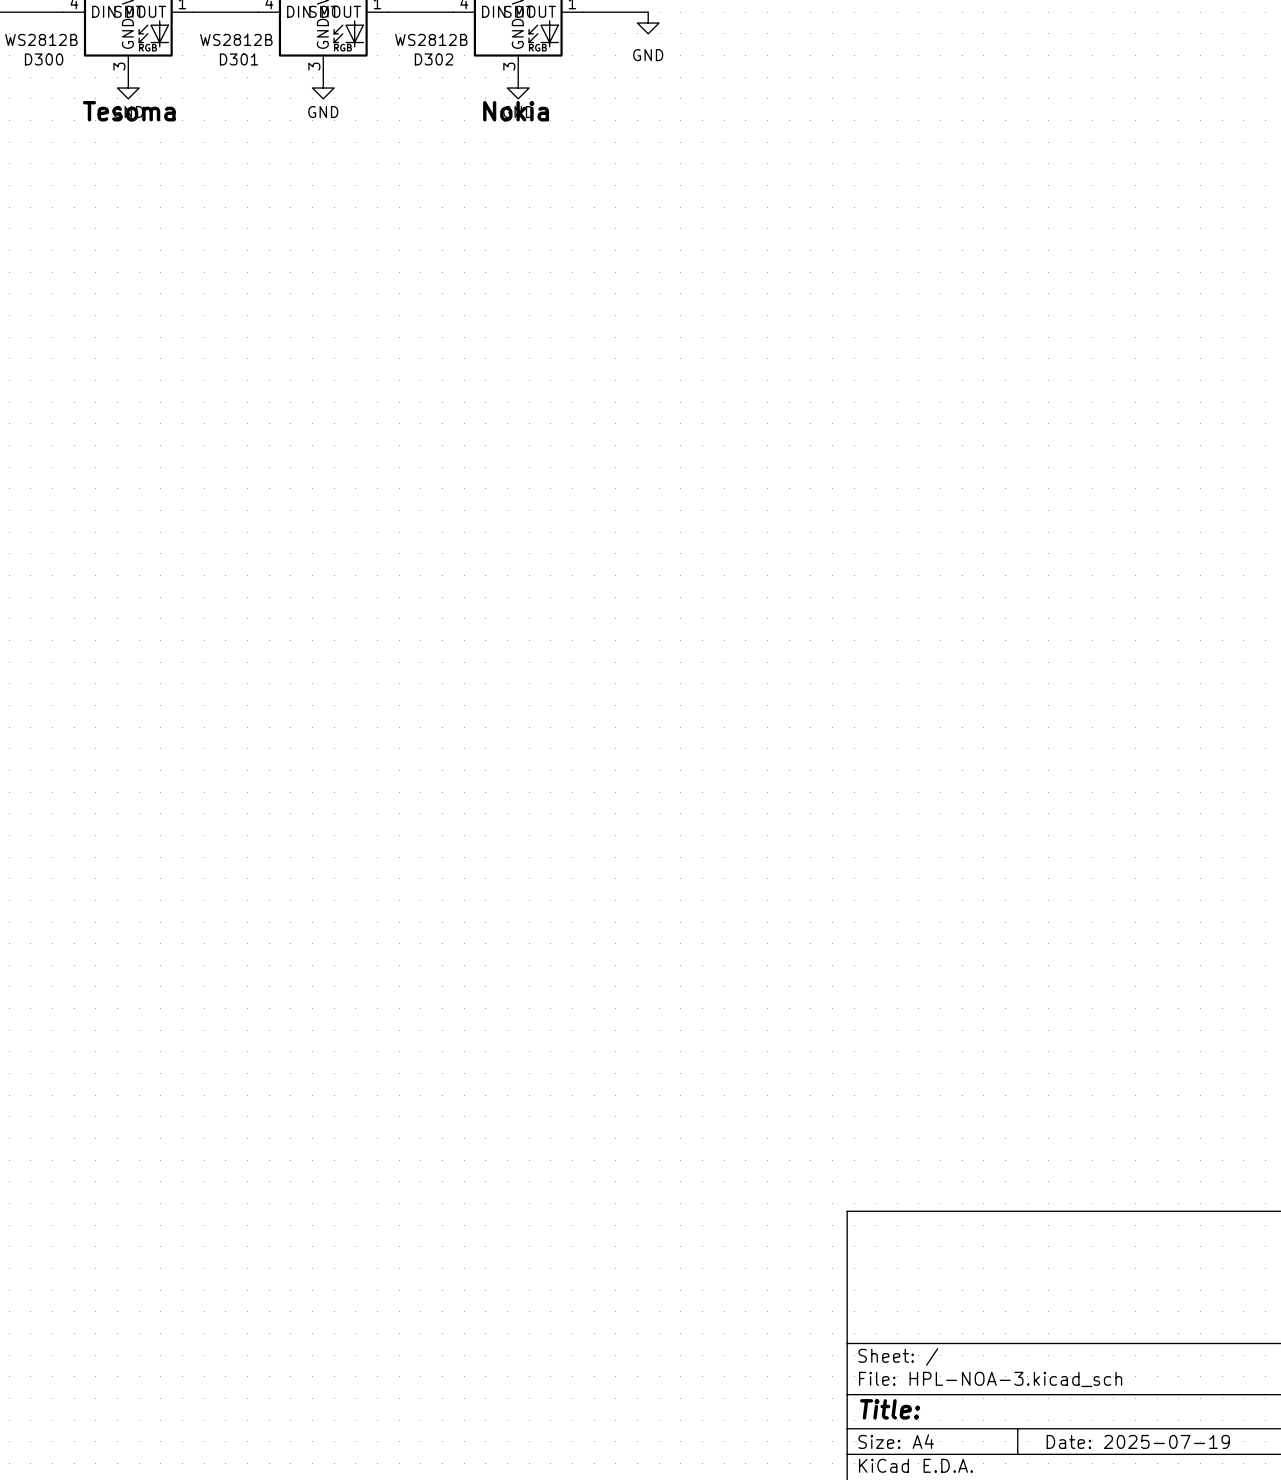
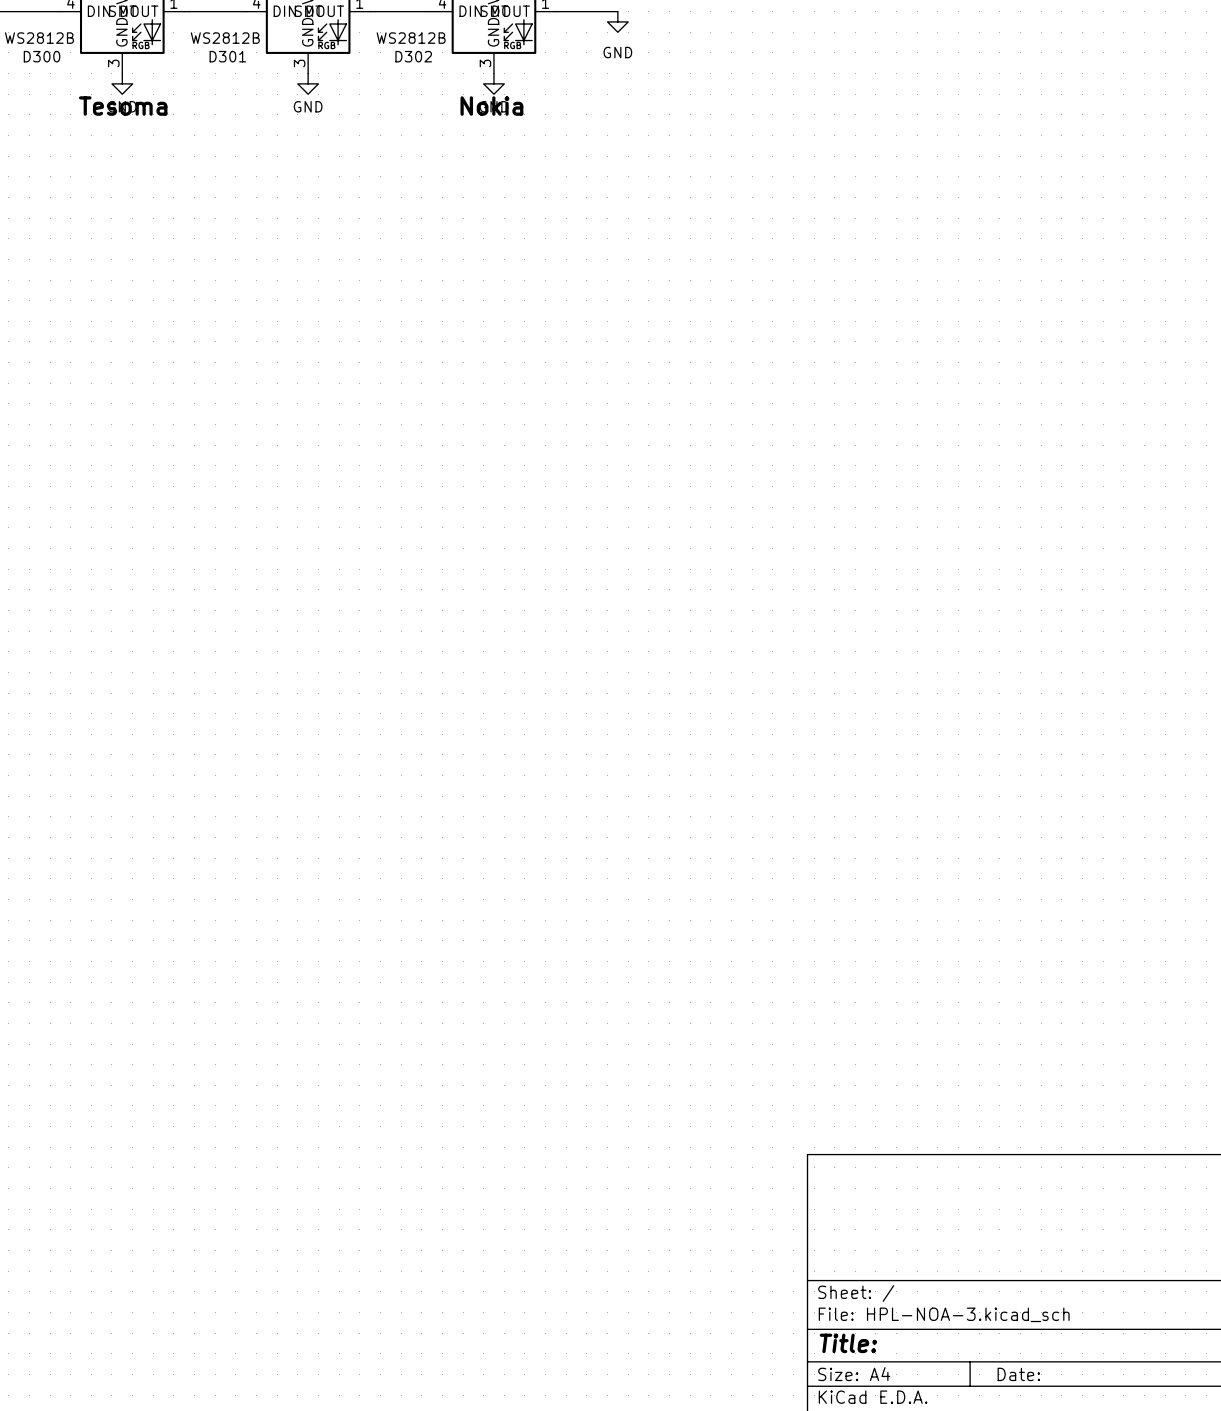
title block: Date: 2025-07-19 (1138, 1441) -> Date: (1018, 1374)

